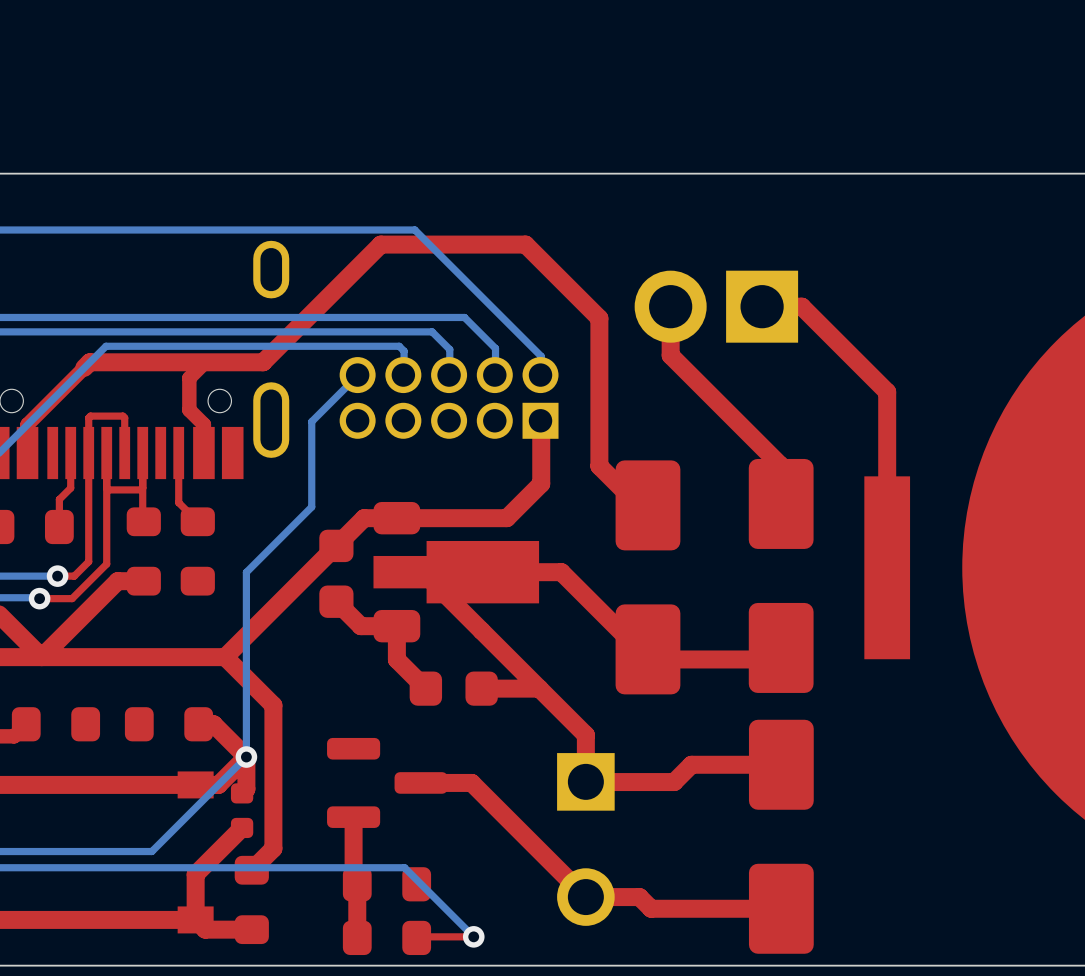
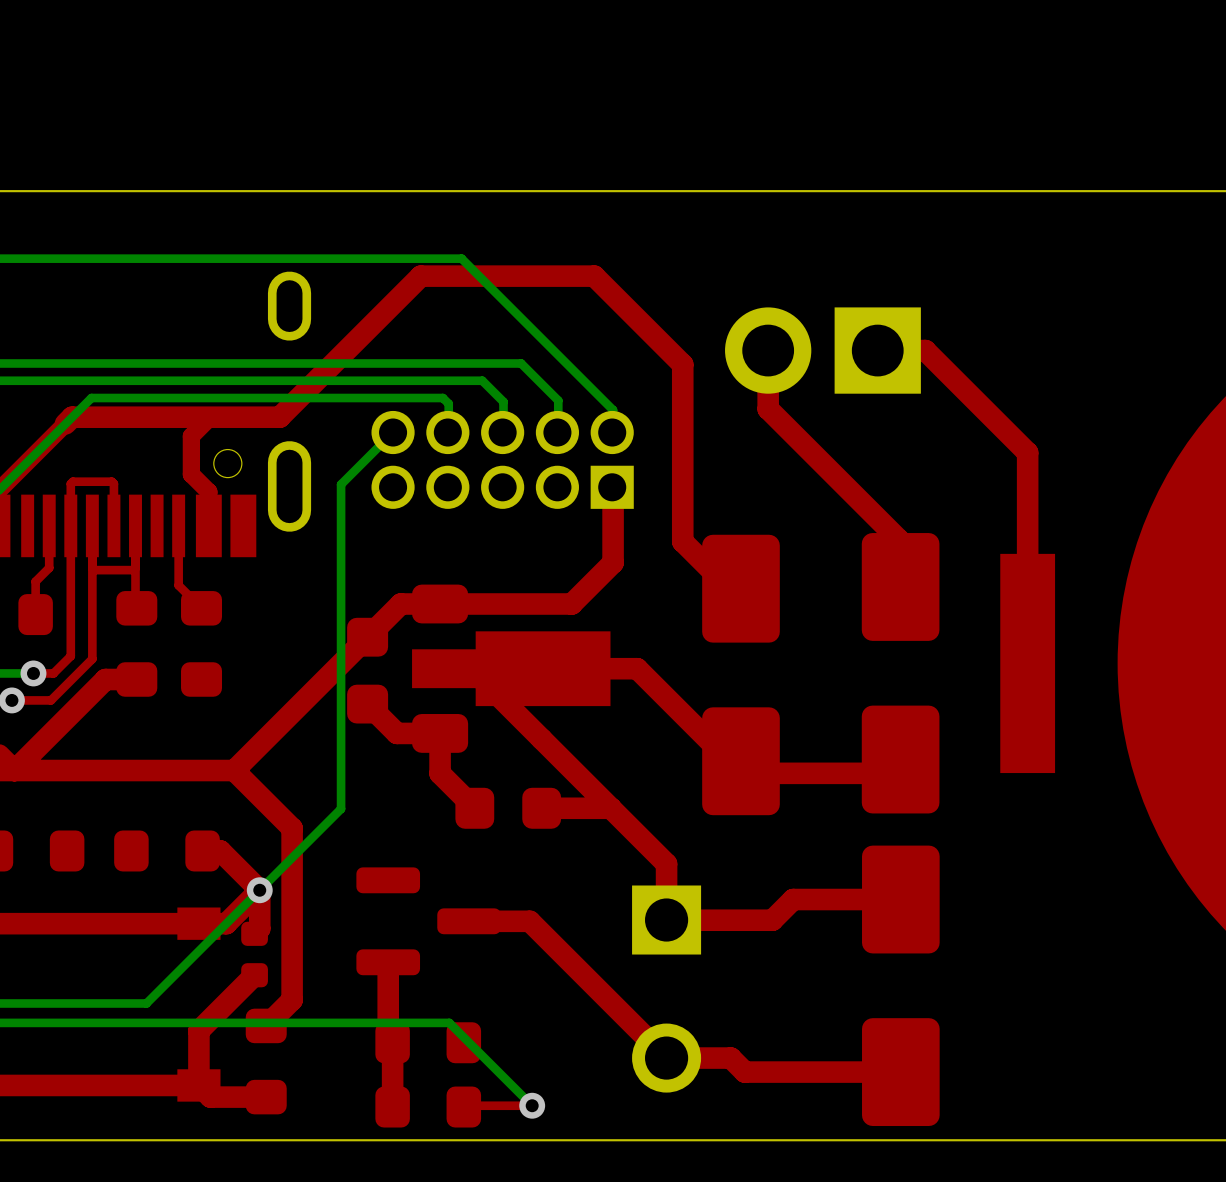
bottom track: (358, 375) (311, 421) (311, 507) (246, 572) (246, 757) -> (393, 432) (341, 484) (341, 808) (259, 890)

